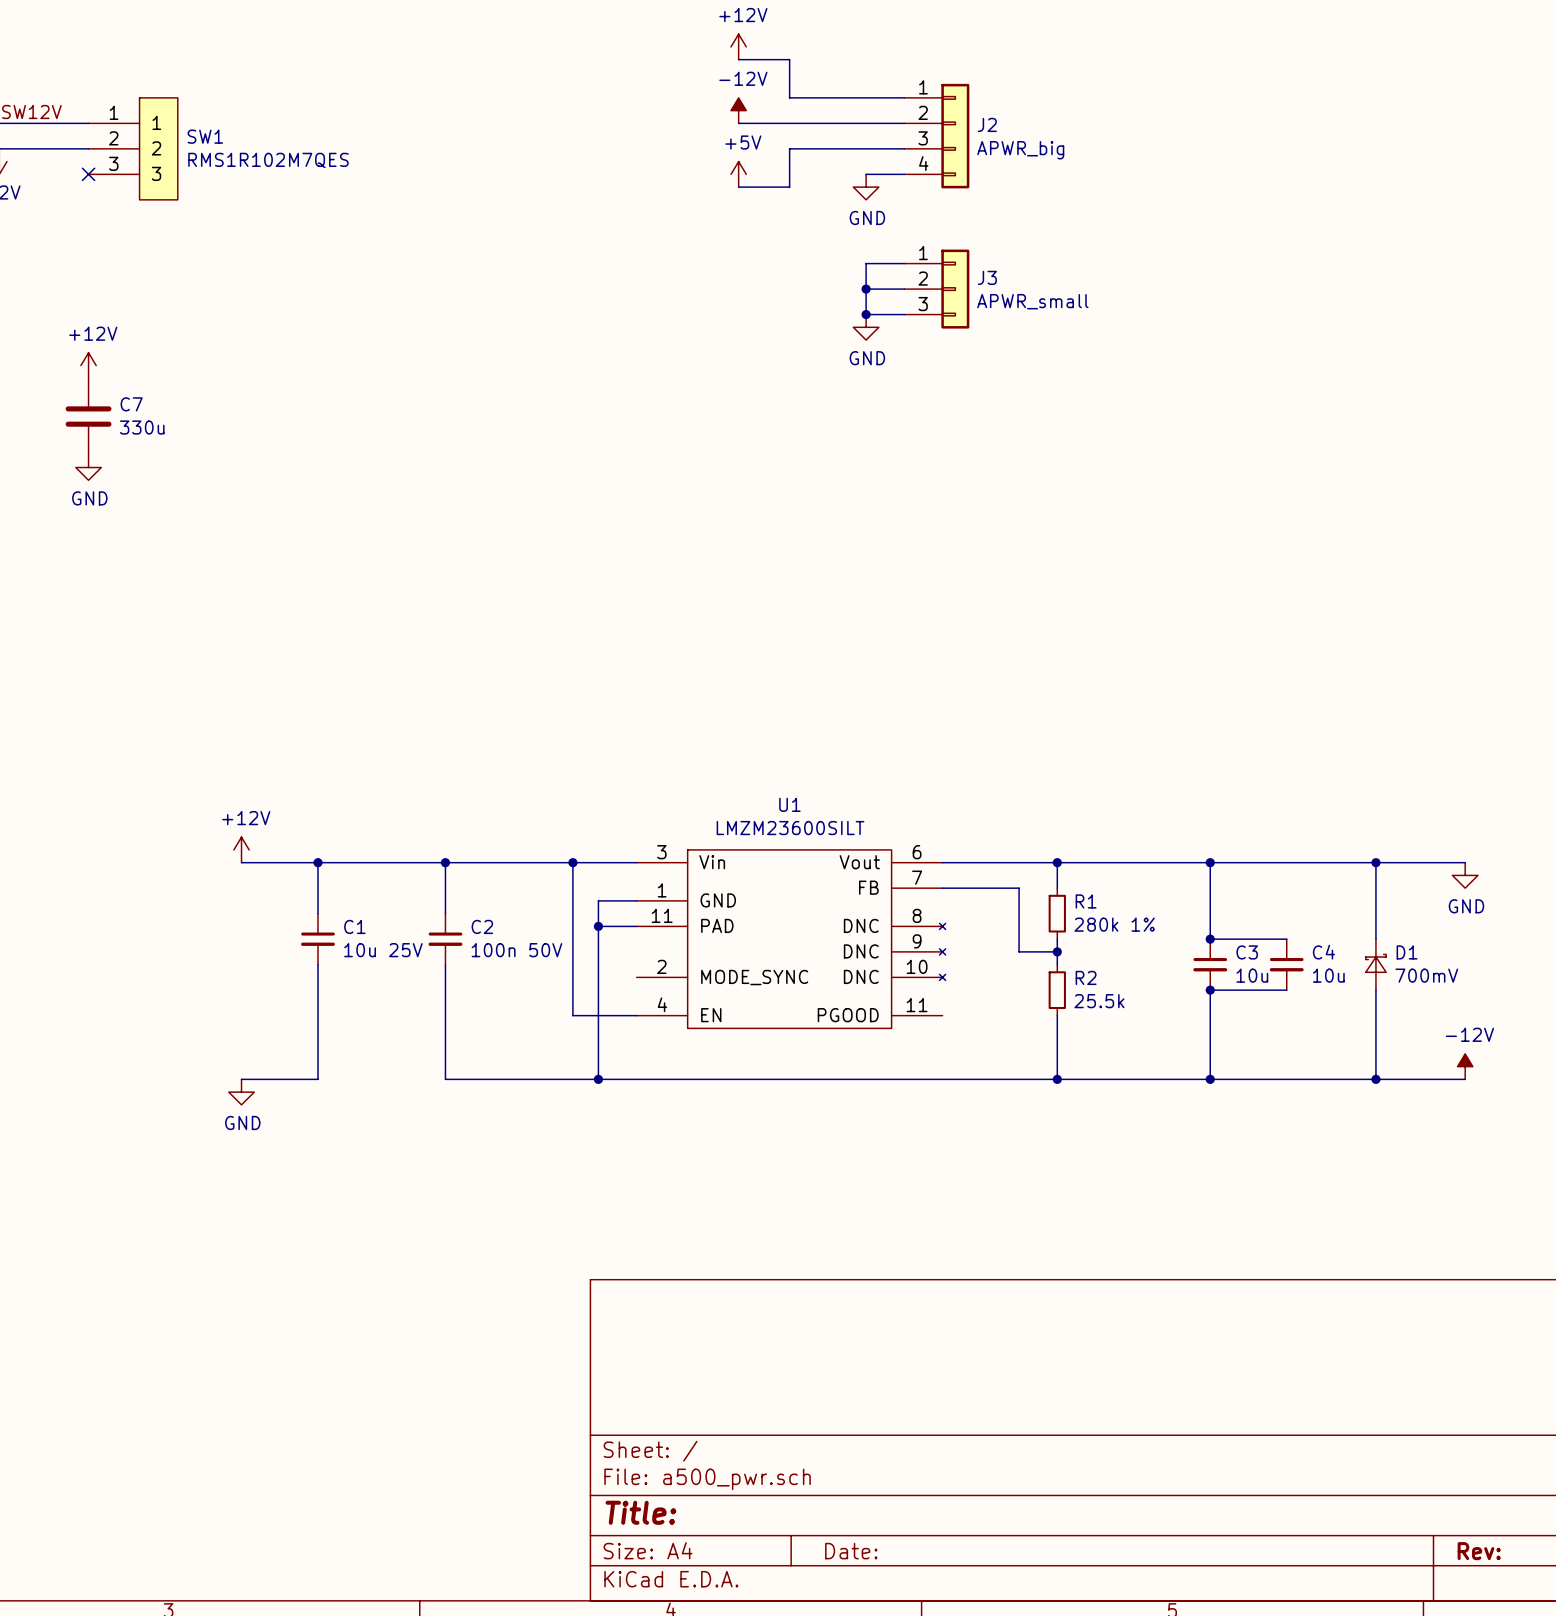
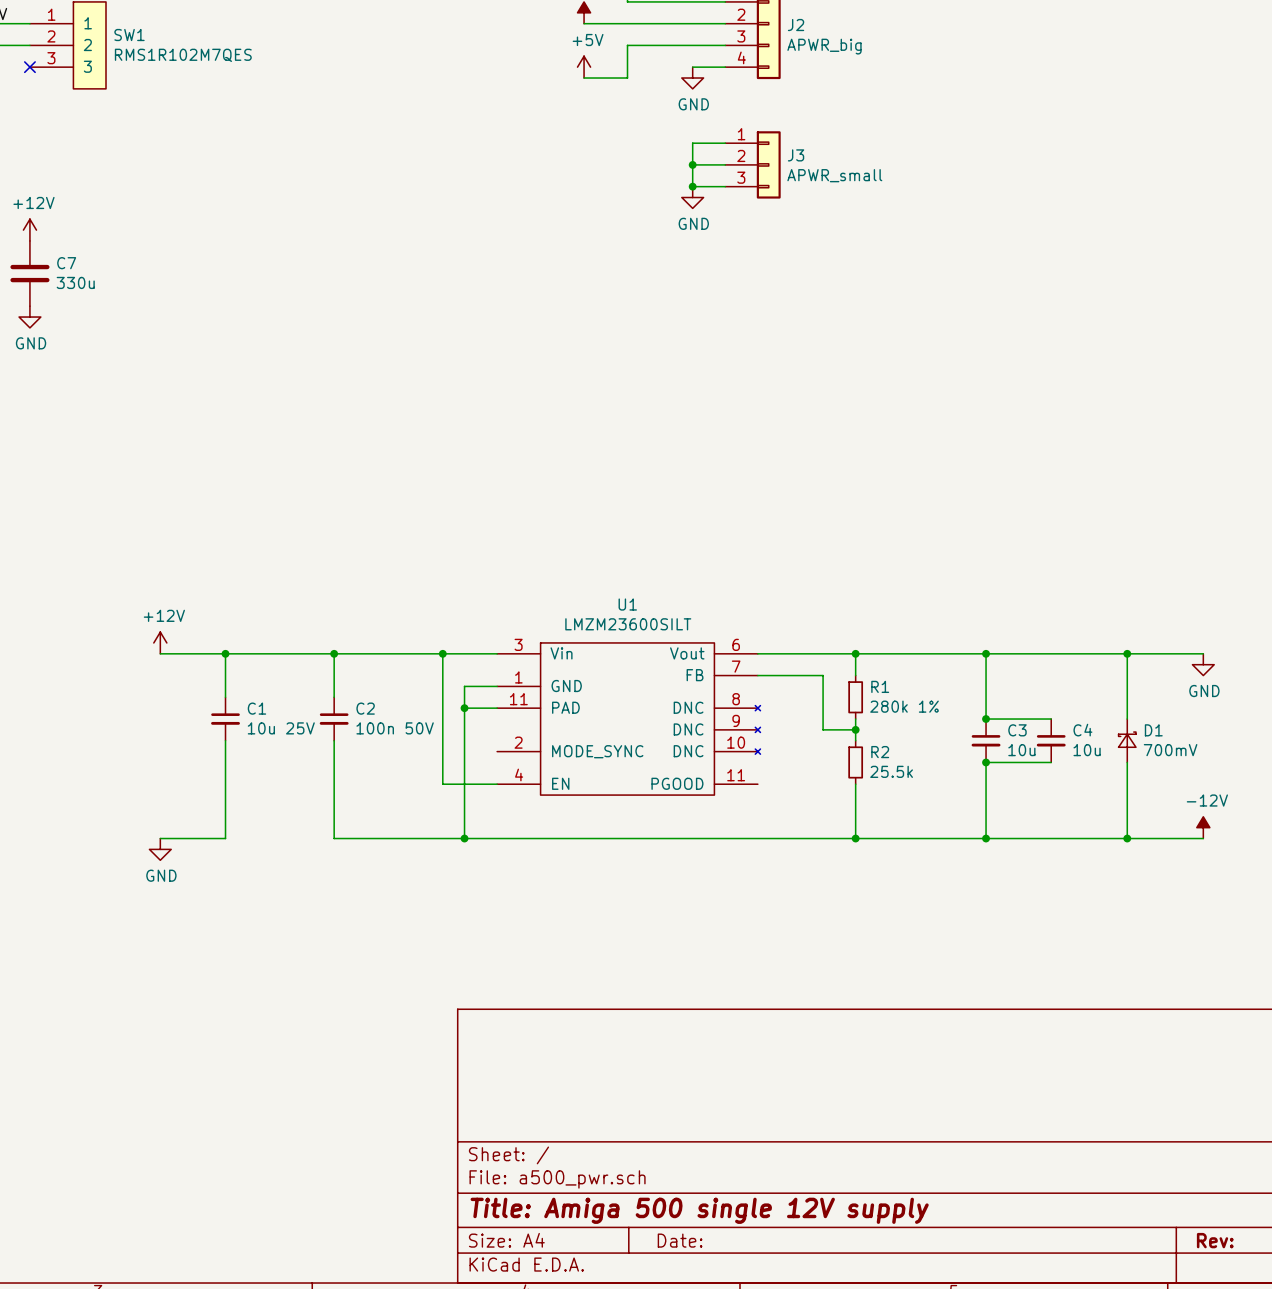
title block: Title: (640, 1512) -> Title: Amiga 500 single 12V supply (699, 1210)

